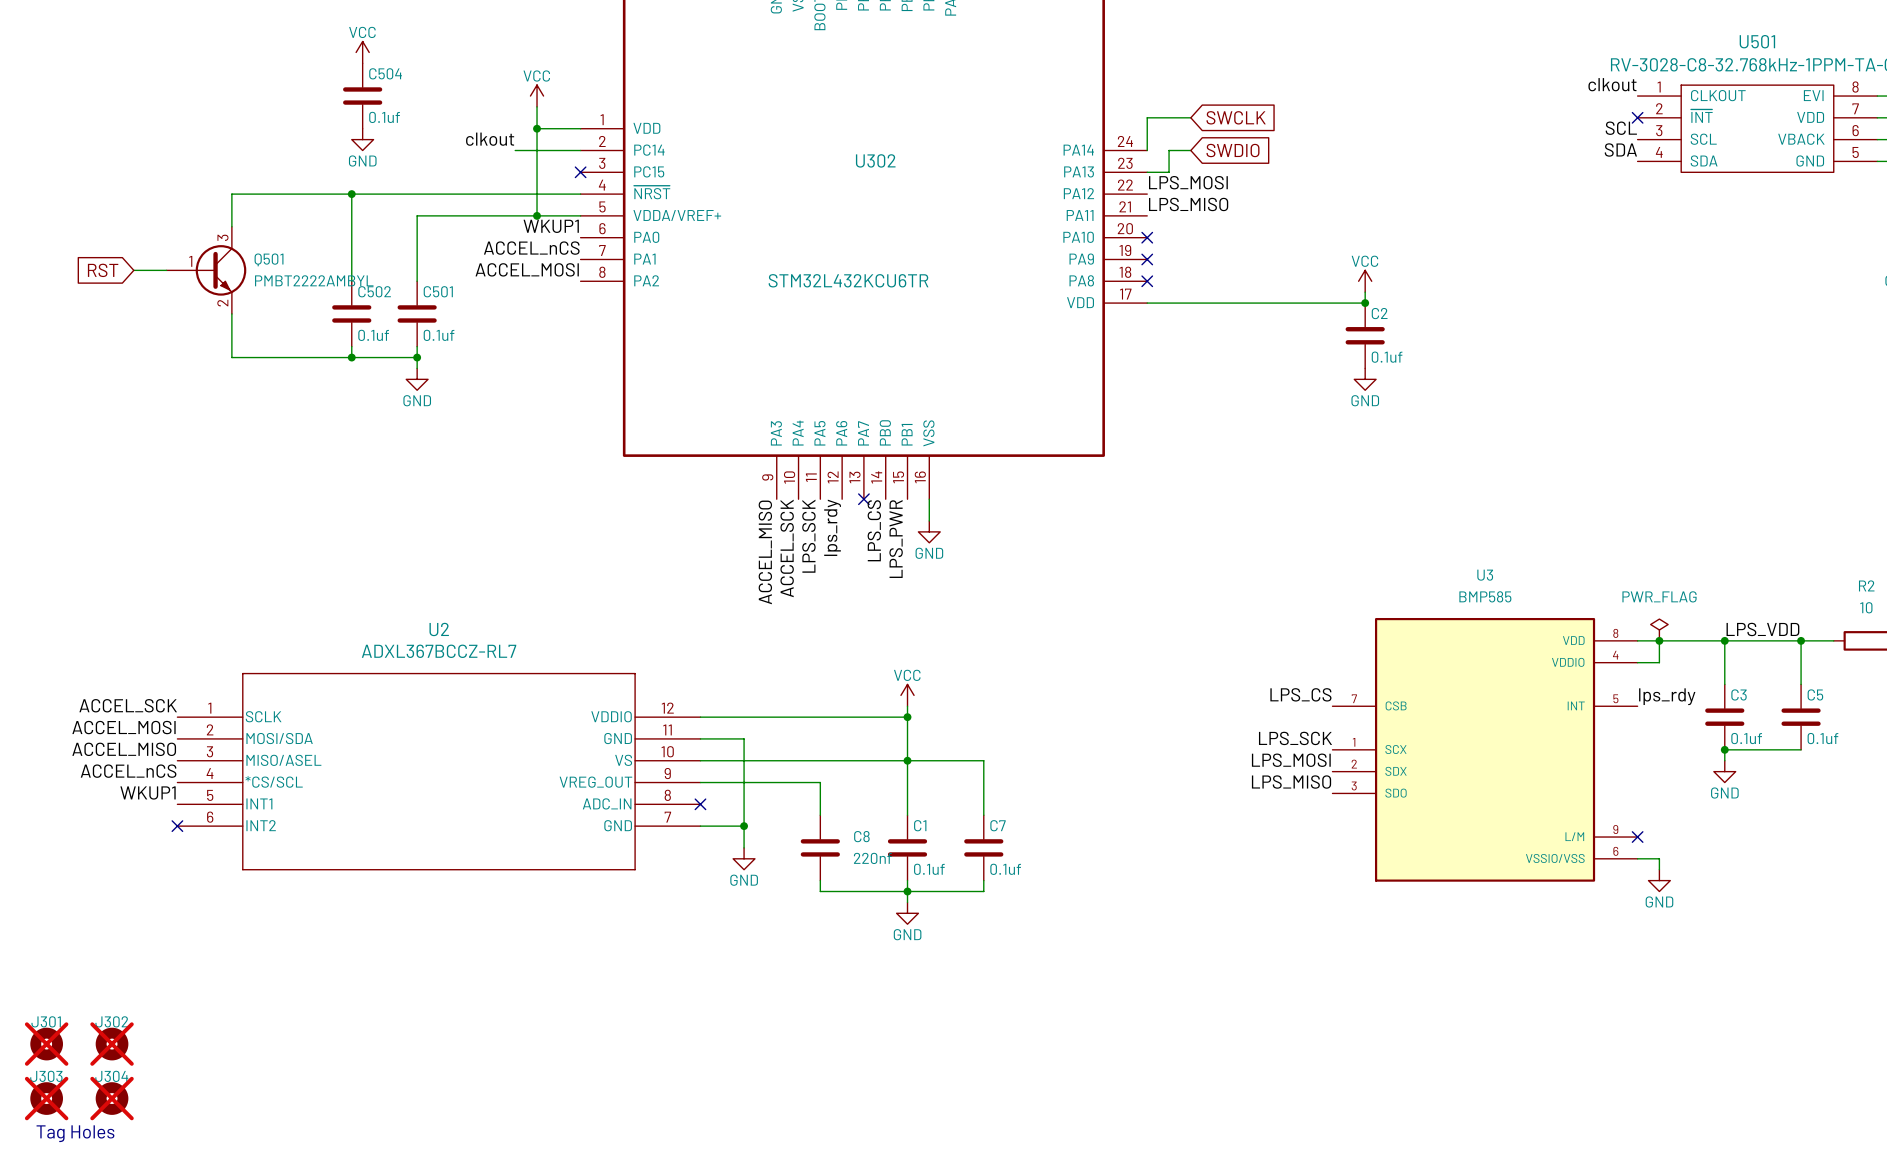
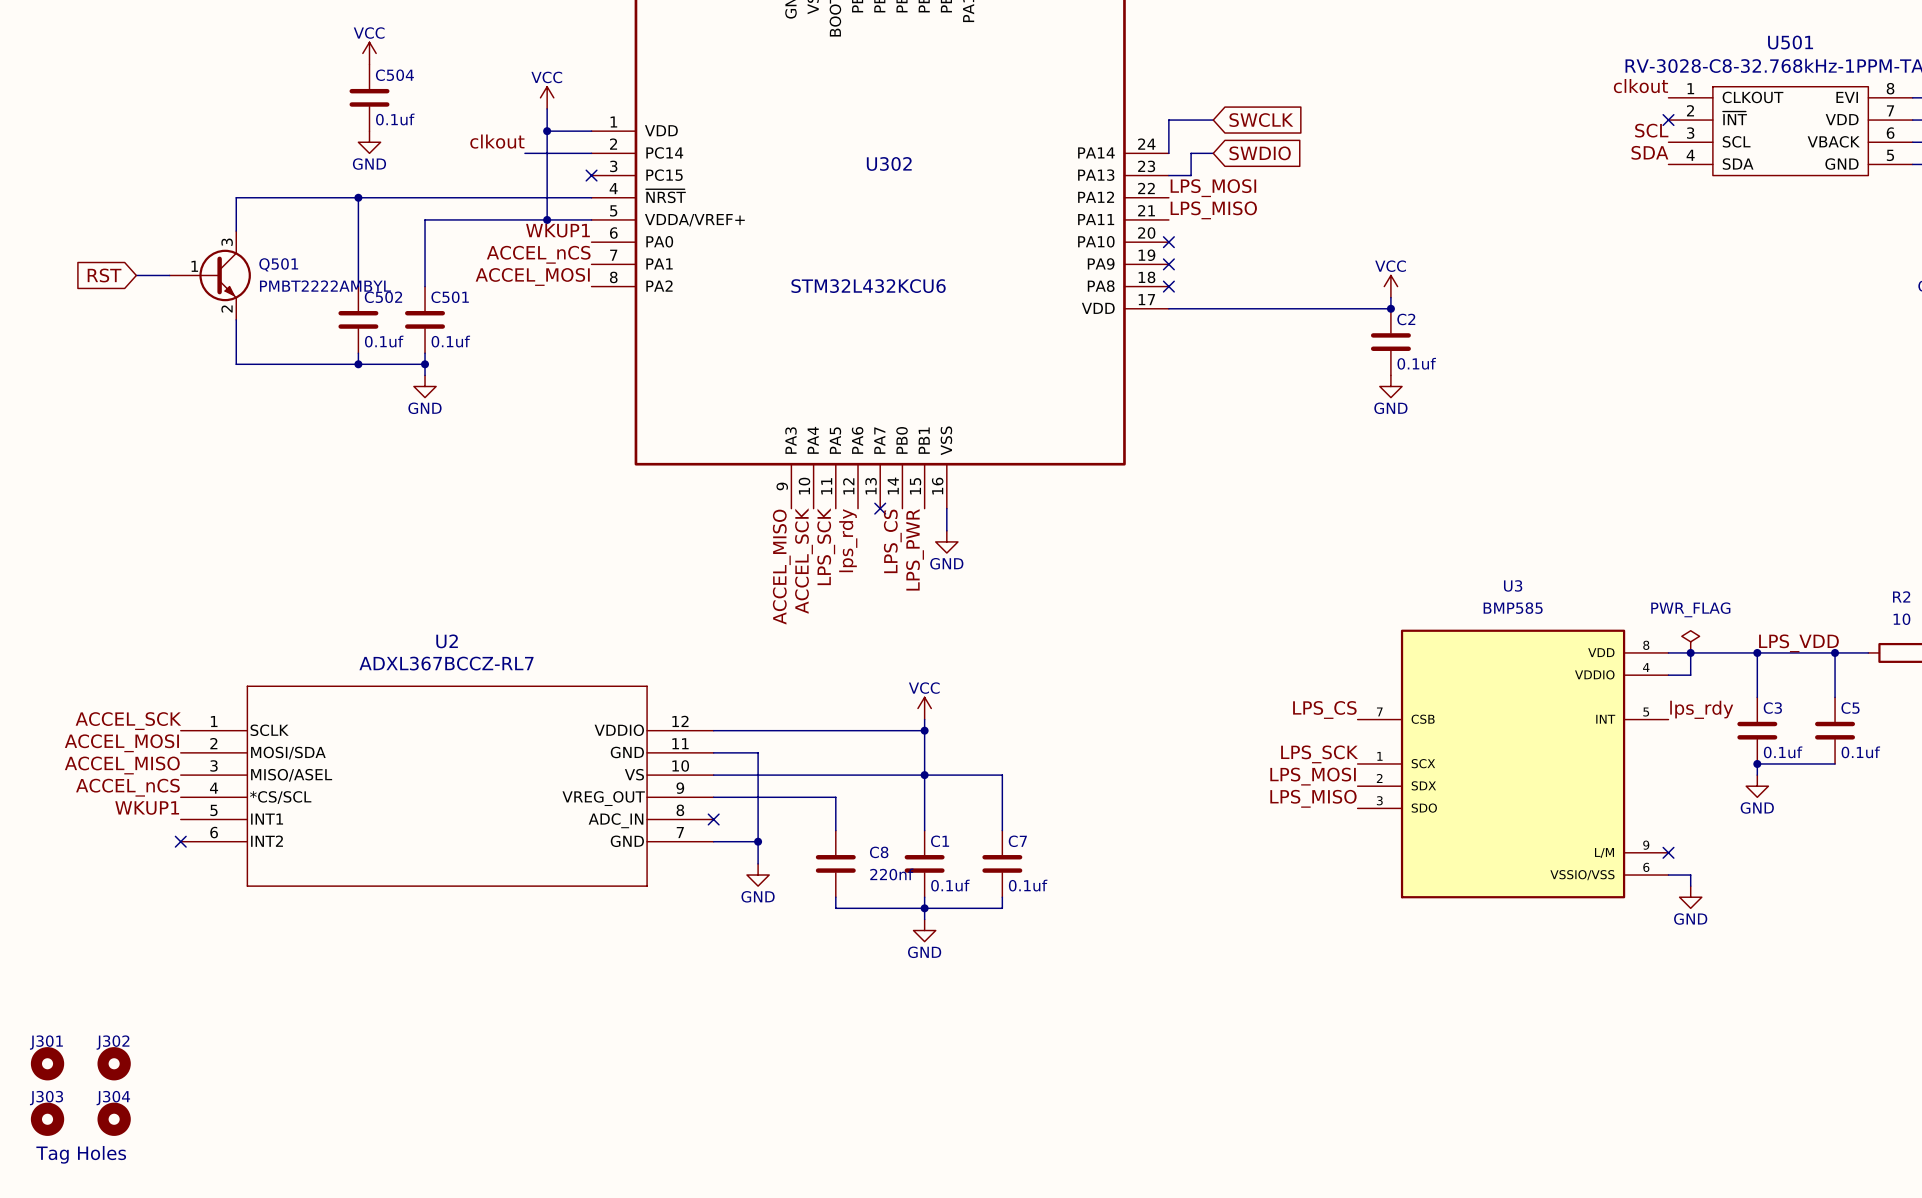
U302 value: STM32L432KCU6TR (848, 280) -> STM32L432KCU6 (868, 286)
J301 do-not-place cross: (46, 1044) -> none
J302 do-not-place cross: (112, 1044) -> none
J303 do-not-place cross: (46, 1098) -> none
J304 do-not-place cross: (112, 1098) -> none

